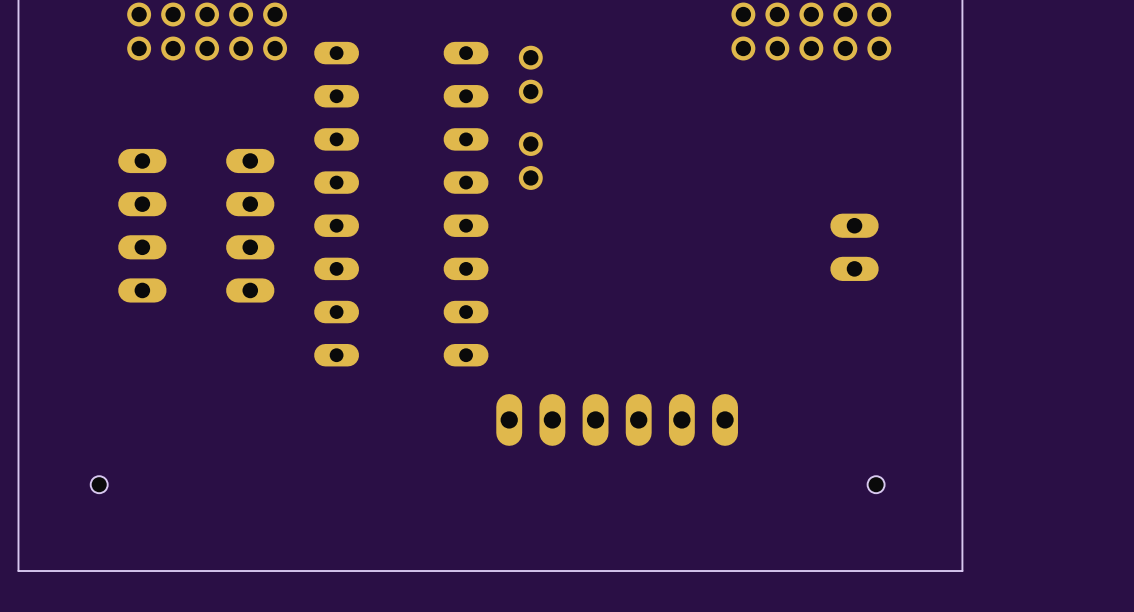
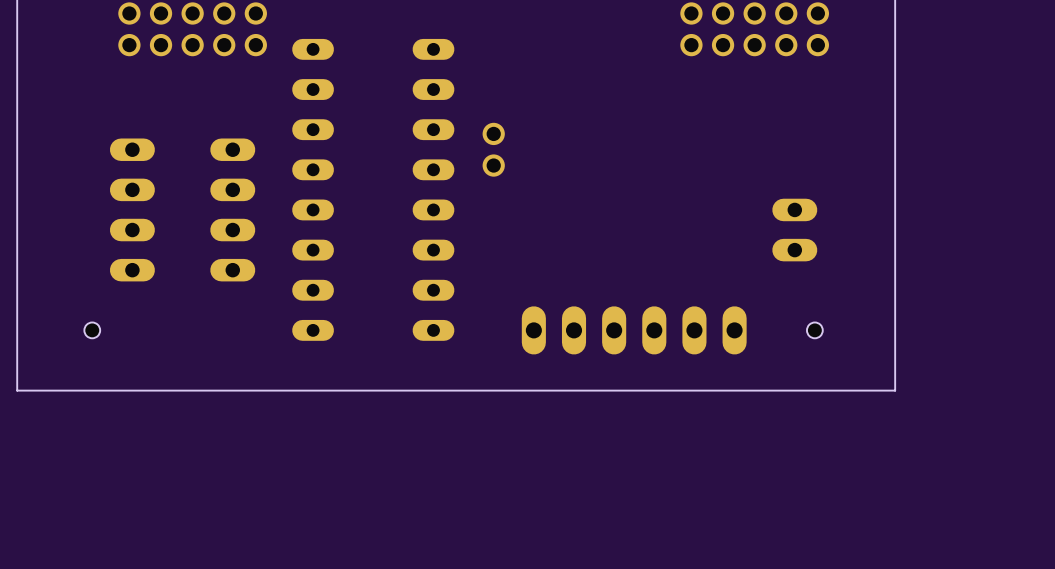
part: (530, 74) -> none
part position: (617, 419) -> (634, 330)
board edge: (962, 419) (962, 571) (18, 571) (18, 419) -> (895, 390) (17, 390)
hole position: (99, 484) -> (92, 330)
hole position: (876, 484) -> (814, 330)

